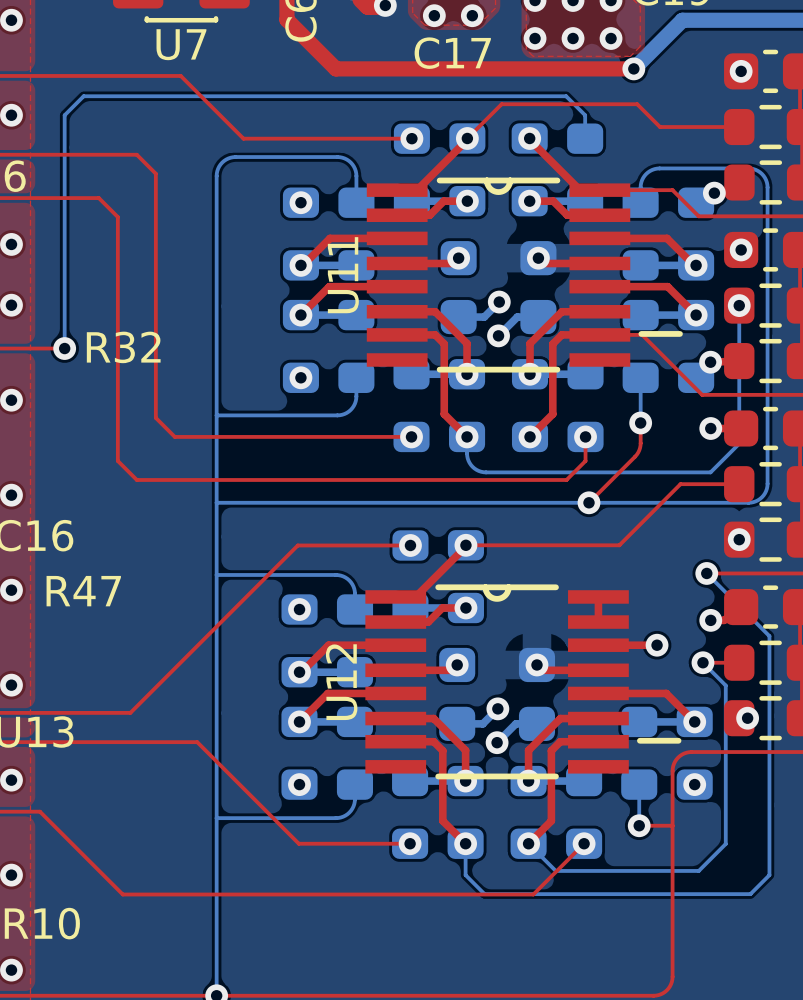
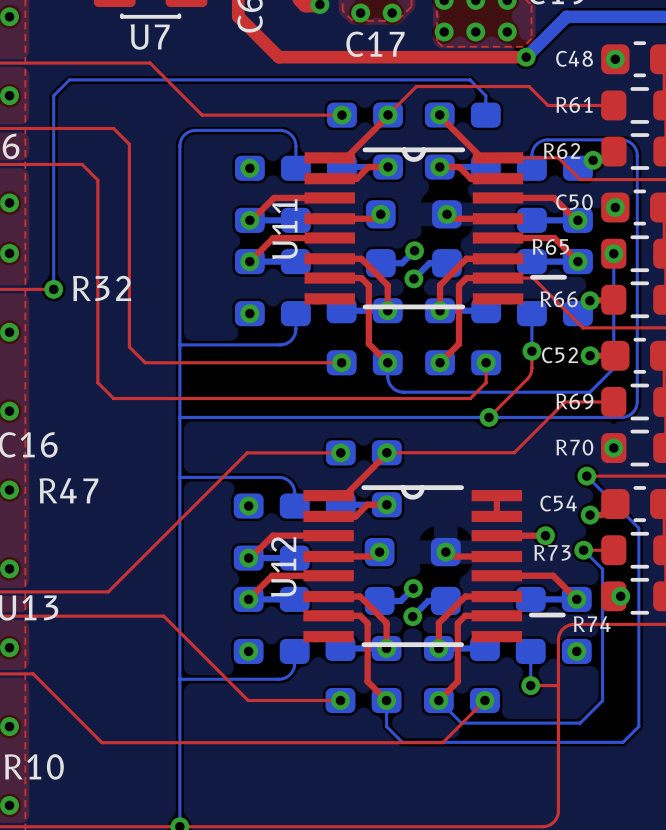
C48 name: none -> C48 (574, 58)
R61 name: none -> R61 (574, 104)
R62 name: none -> R62 (562, 151)
C50 name: none -> C50 (574, 202)
R65 name: none -> R65 (550, 246)
R66 name: none -> R66 (559, 299)
C52 name: none -> C52 (559, 355)
R69 name: none -> R69 (574, 401)
R70 name: none -> R70 (574, 447)
C54 name: none -> C54 (558, 503)
R73 name: none -> R73 (552, 552)
R74 name: none -> R74 (592, 624)

